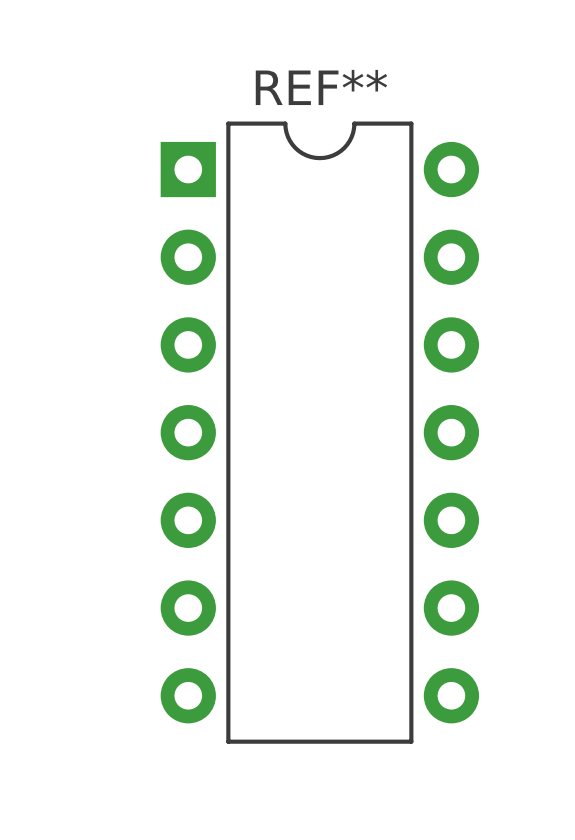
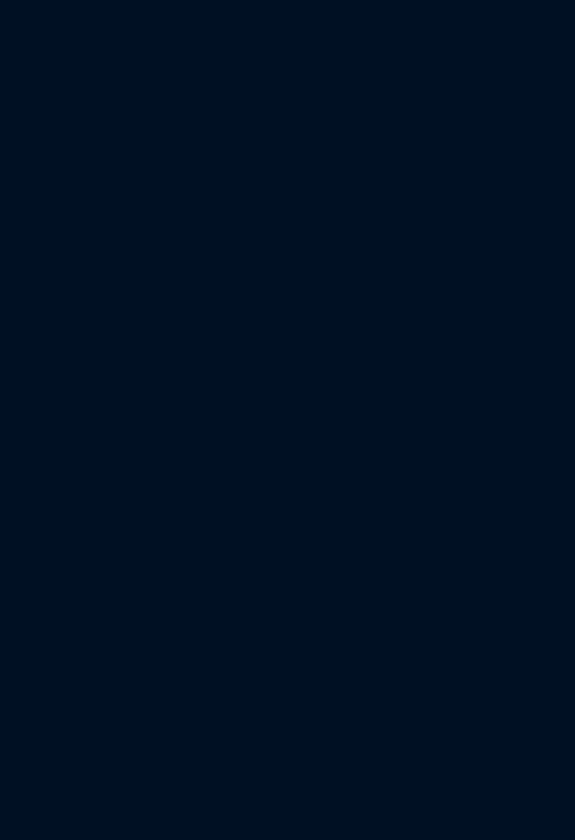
REF**: (319, 432) -> none

